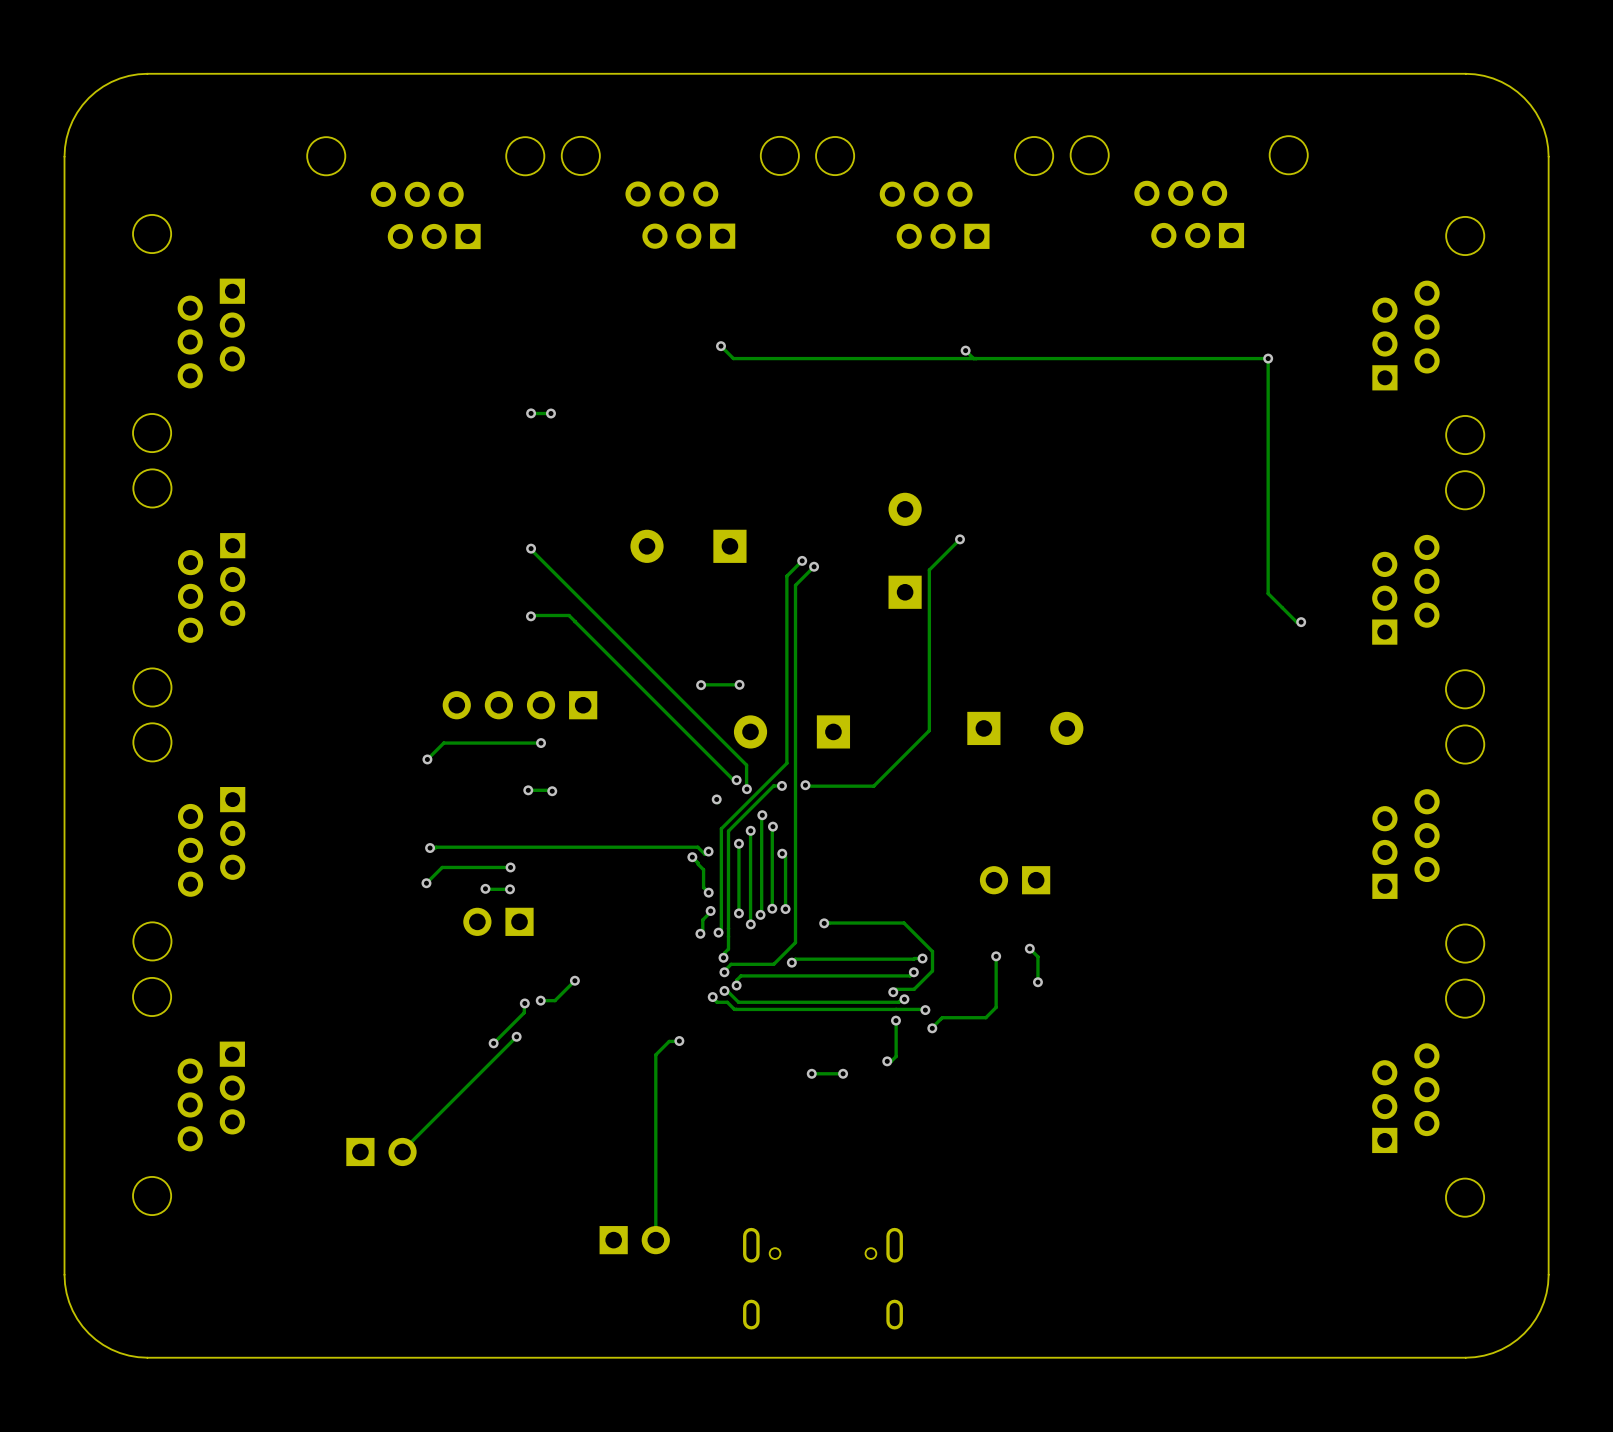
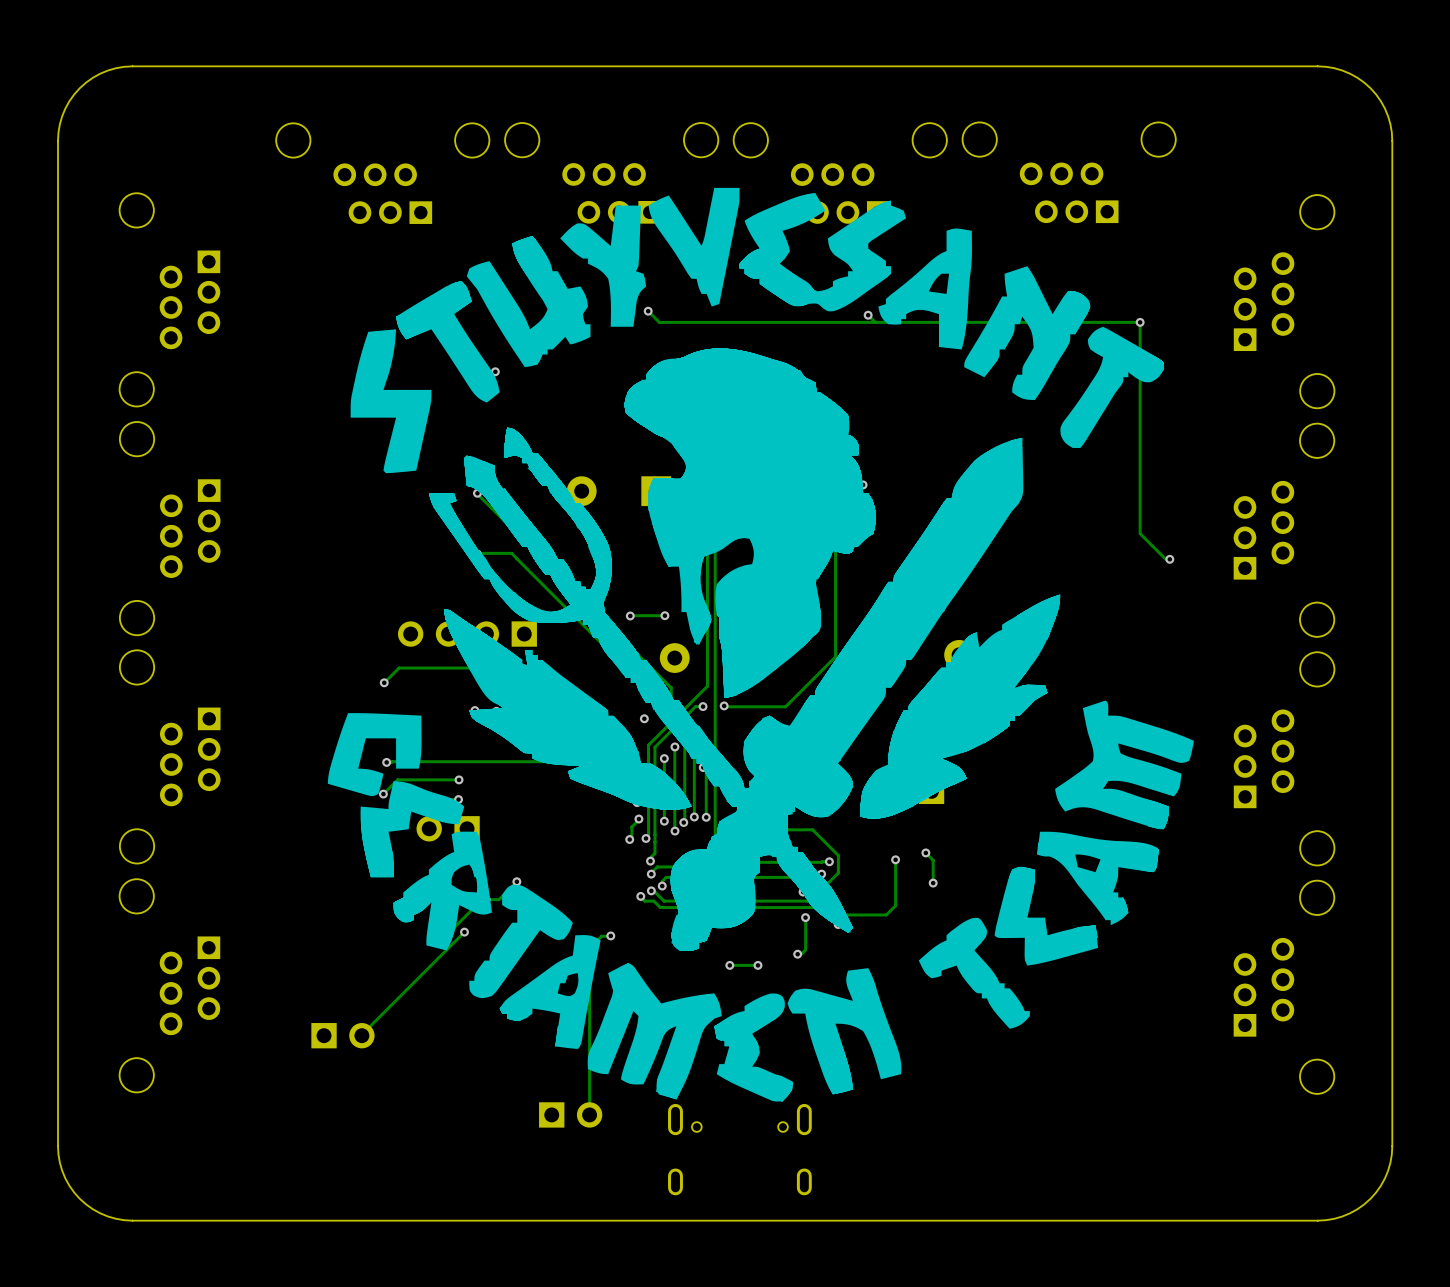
drawing: none -> [327, 187, 1194, 1102]

